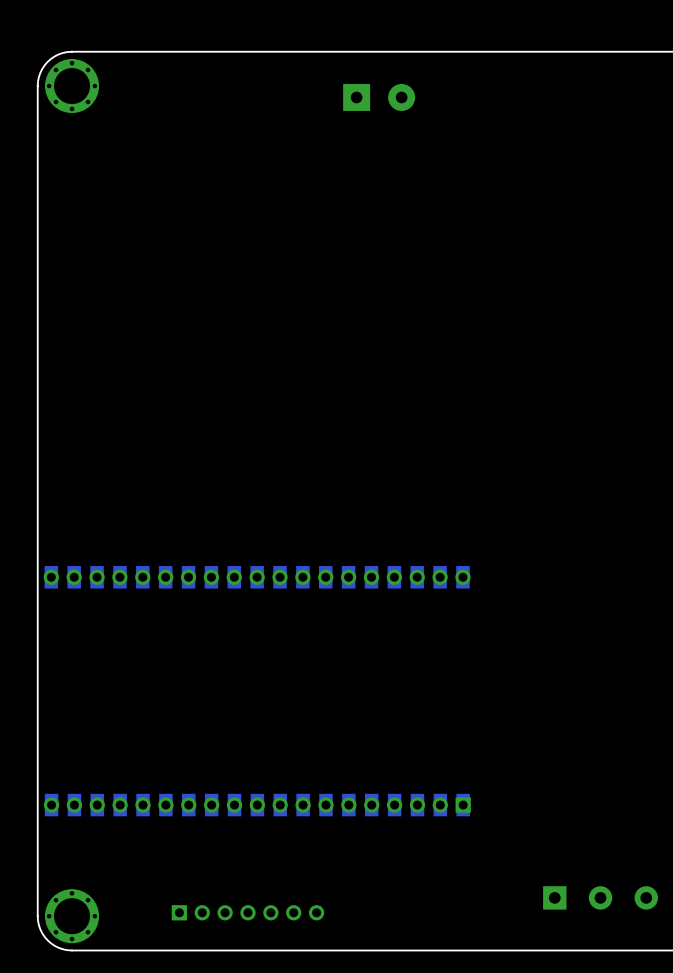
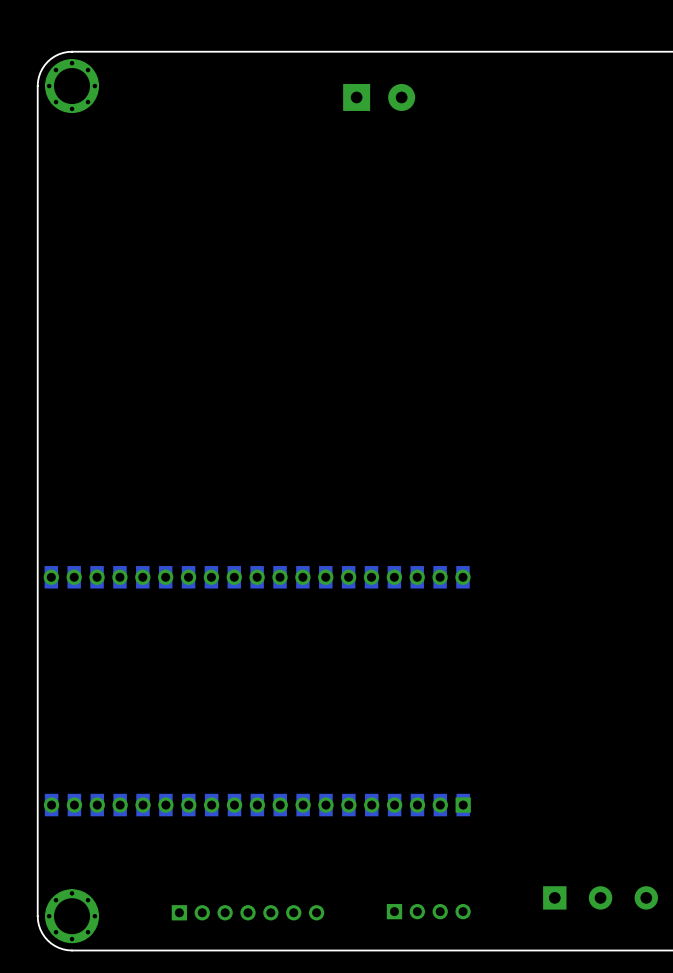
part: none -> (428, 911)

